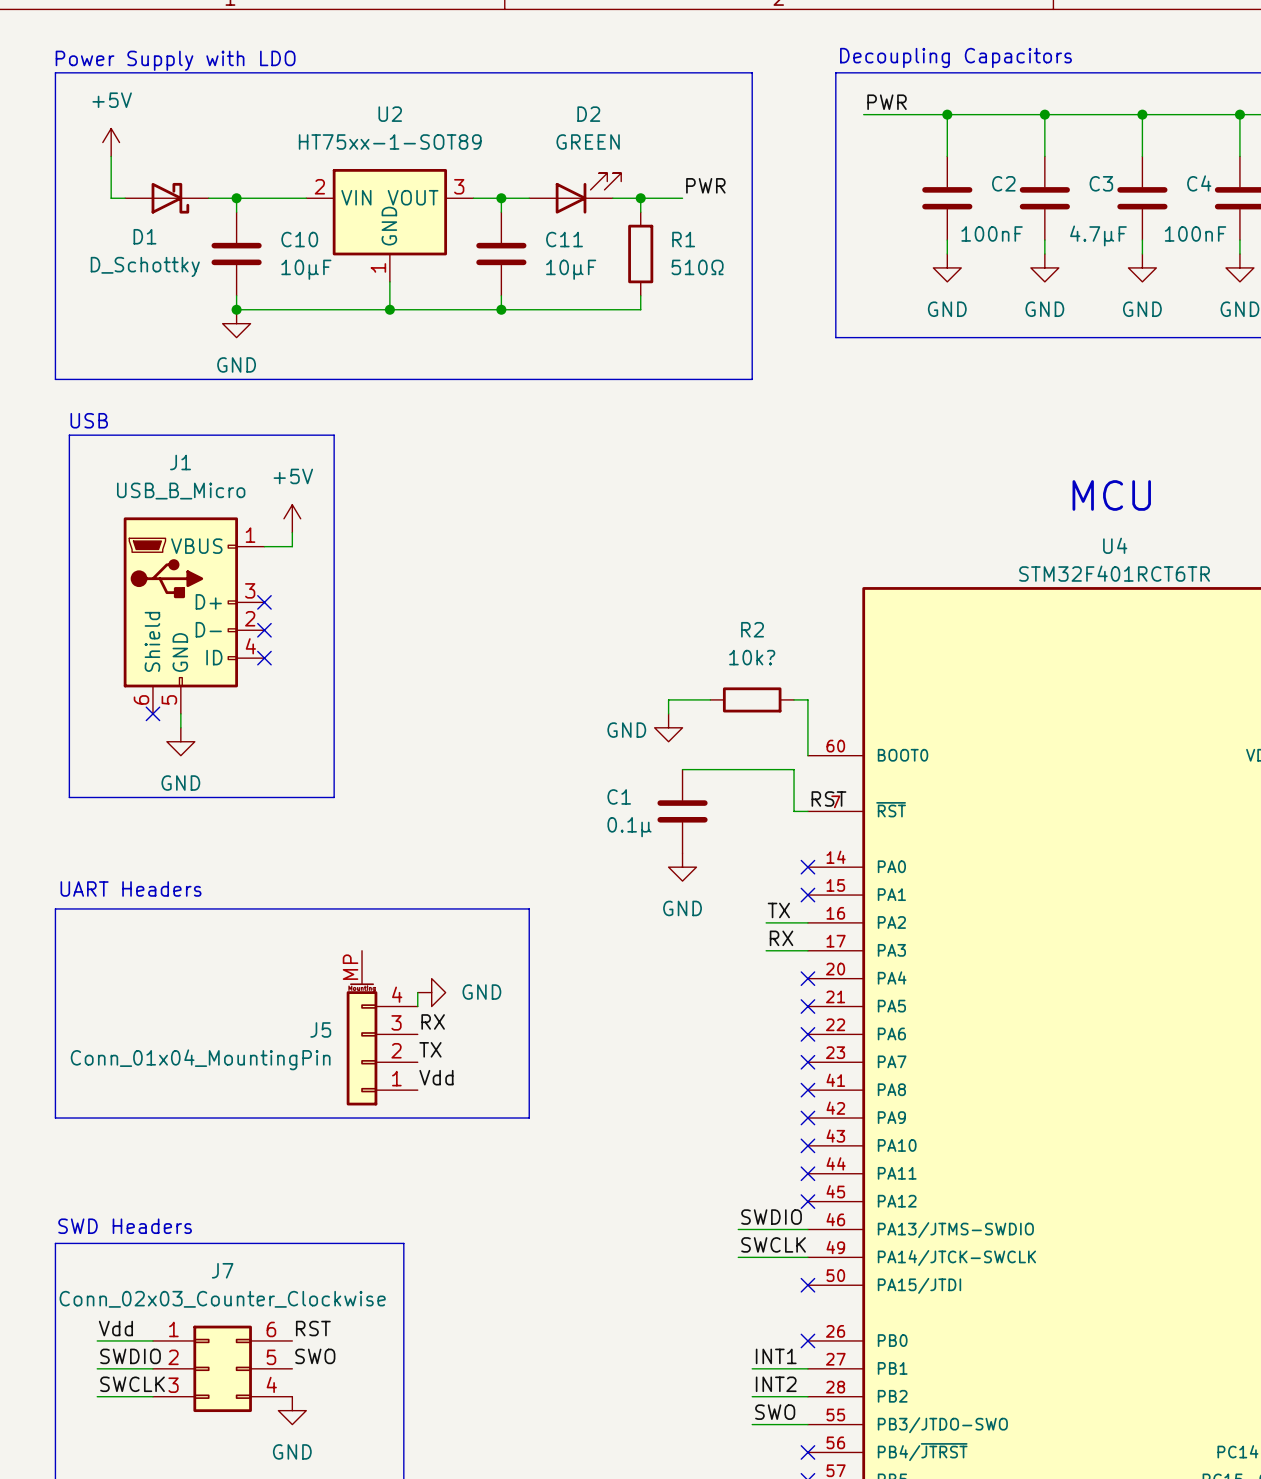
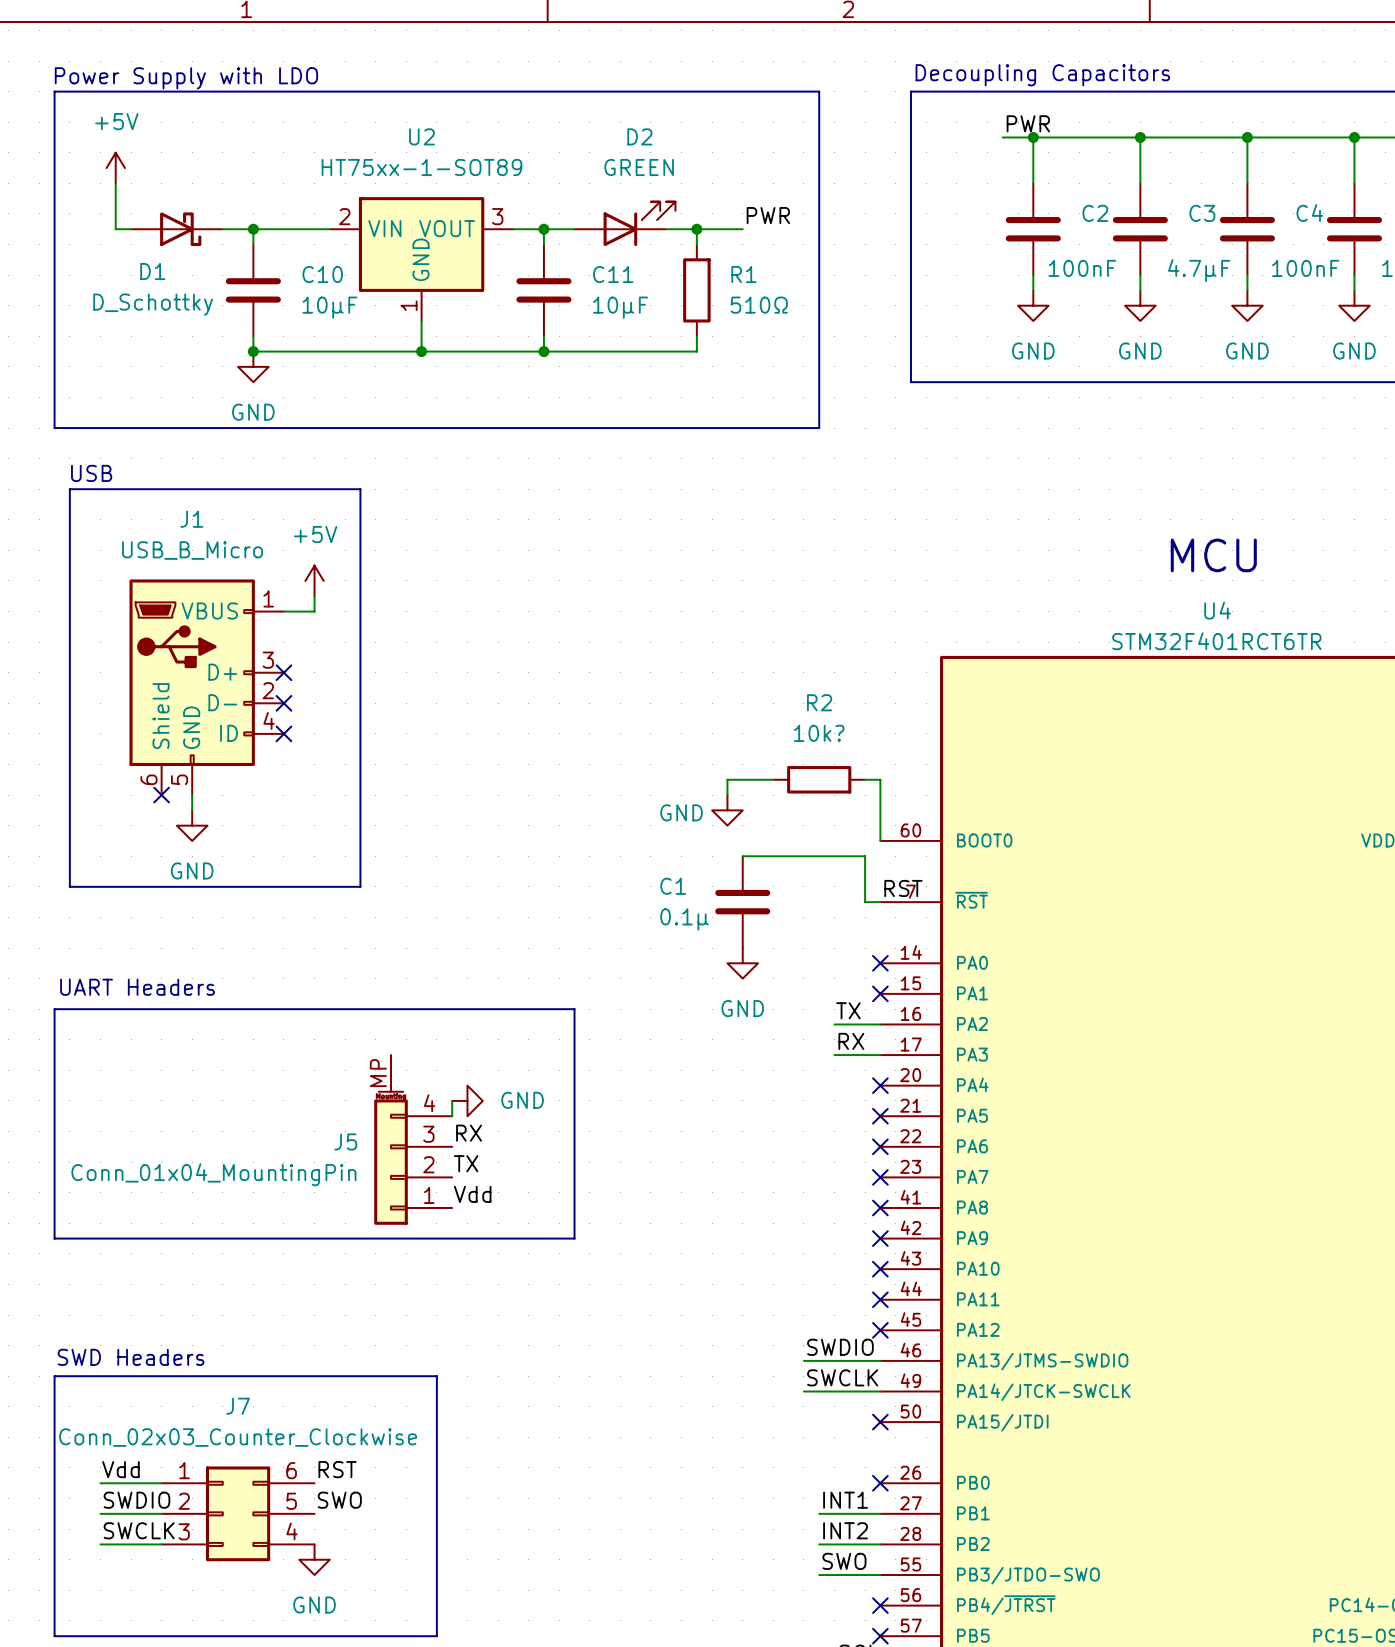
label position: PWR (887, 102) -> PWR (1028, 123)
wire: (863, 114) (919, 114) -> none

